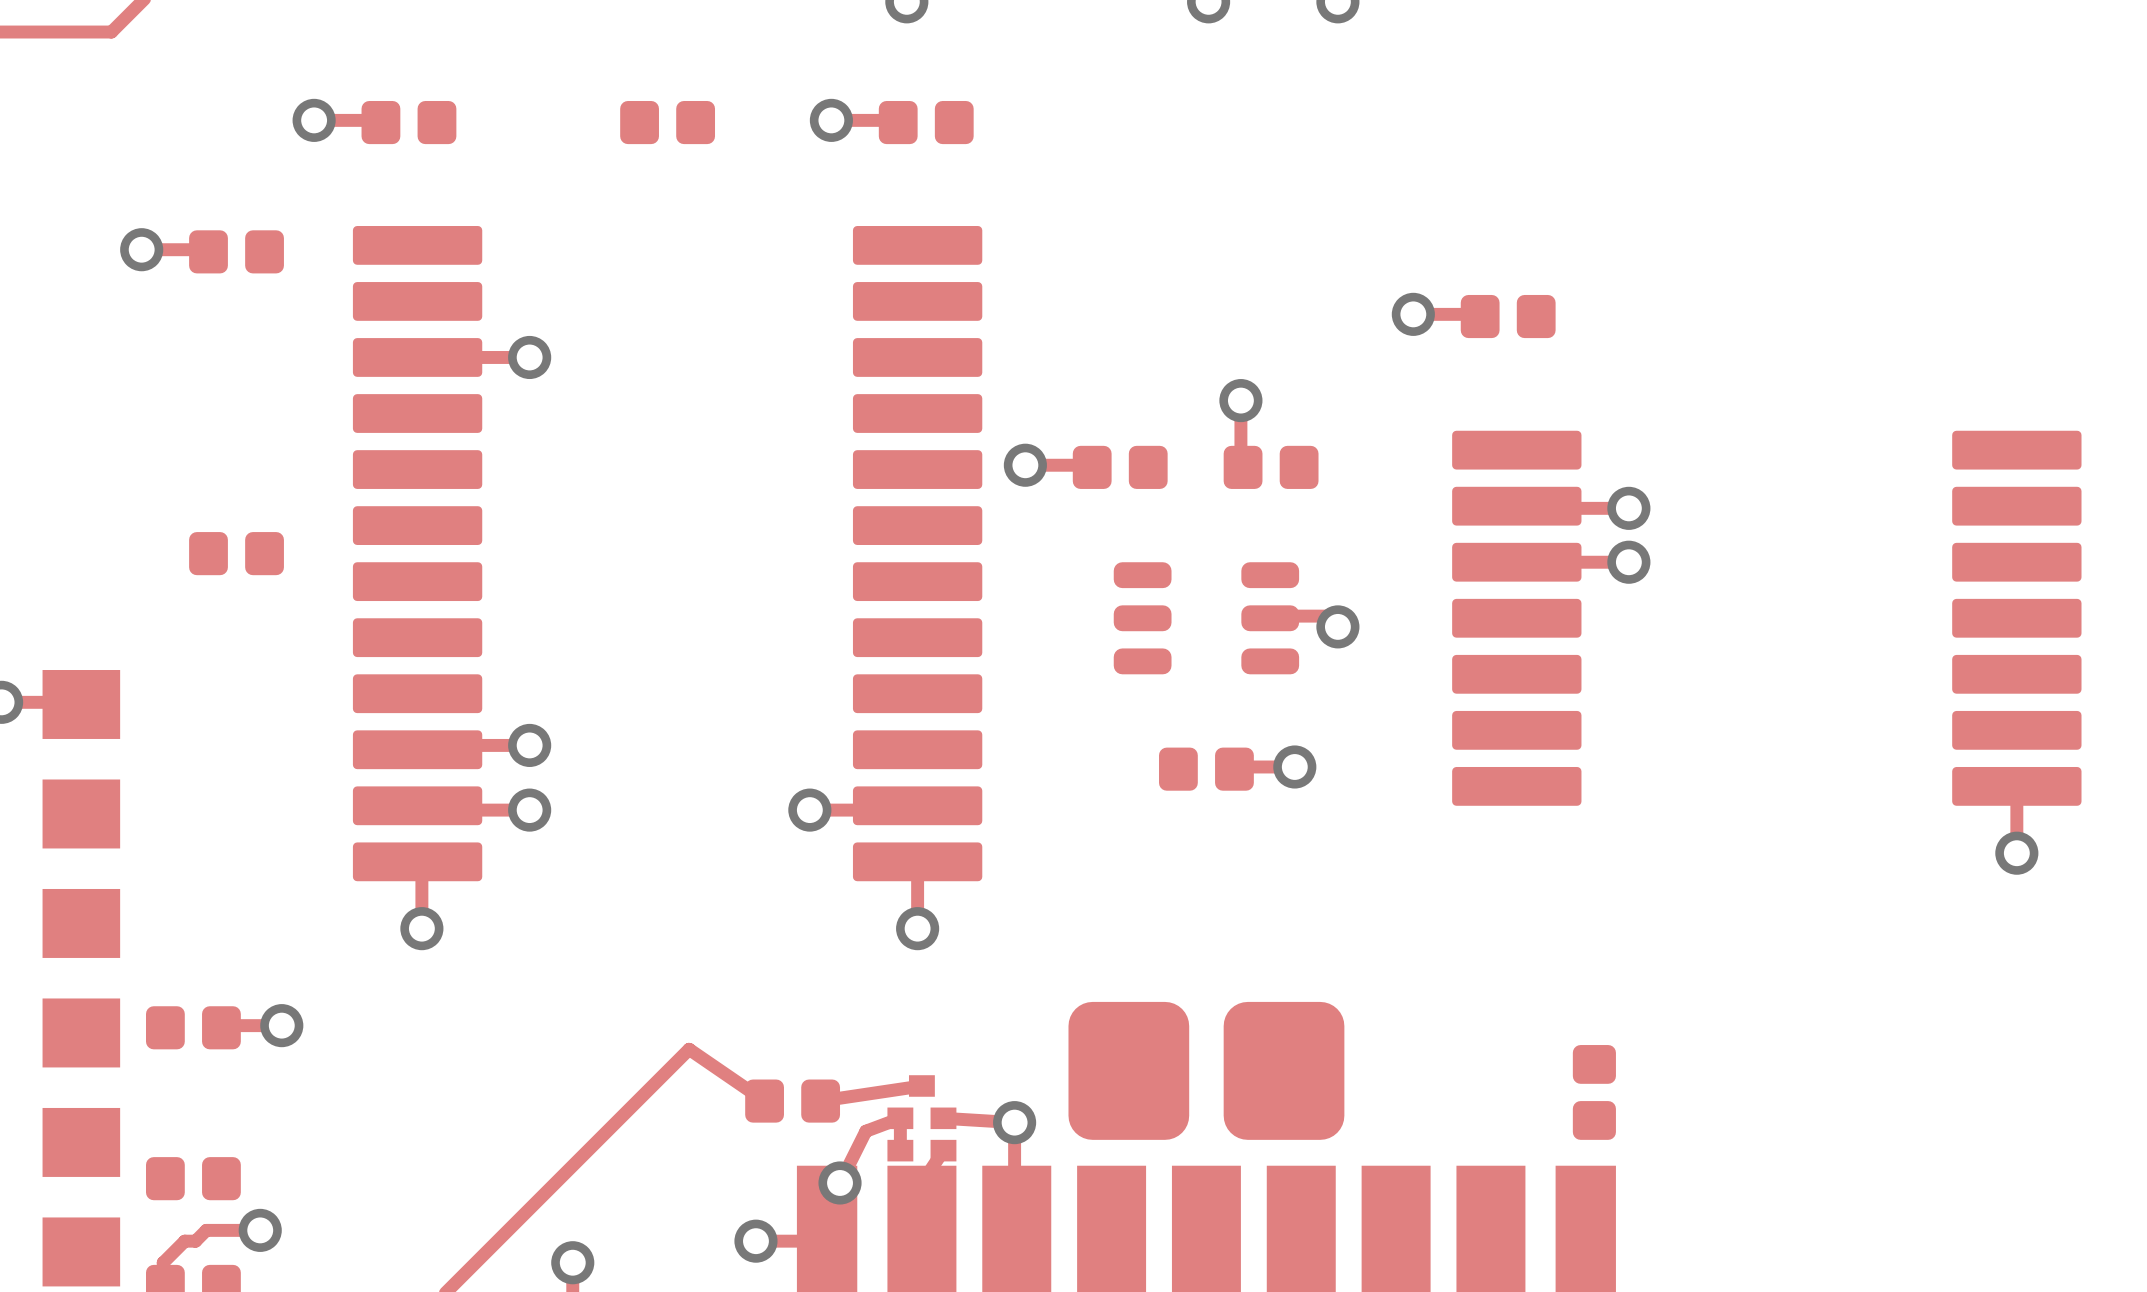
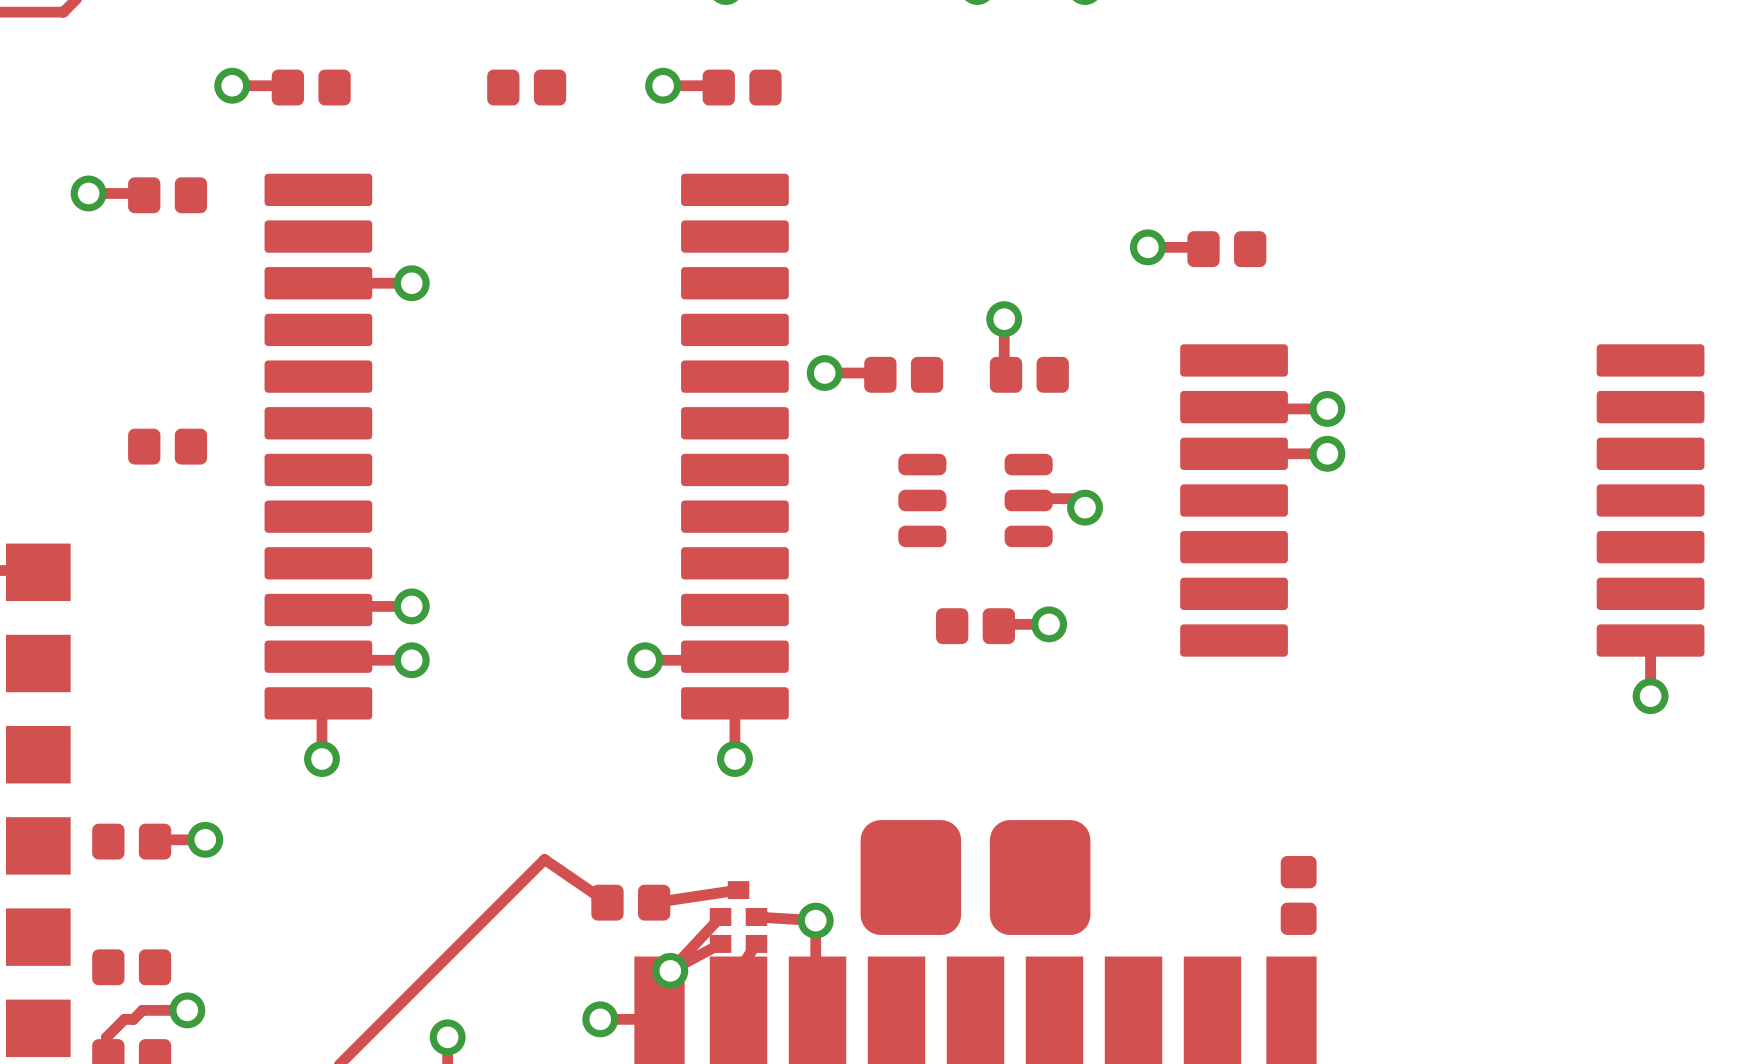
top track: (900, 1150) (900, 1118) (865, 1131) (840, 1182) -> (720, 943) (670, 970) (720, 917)

